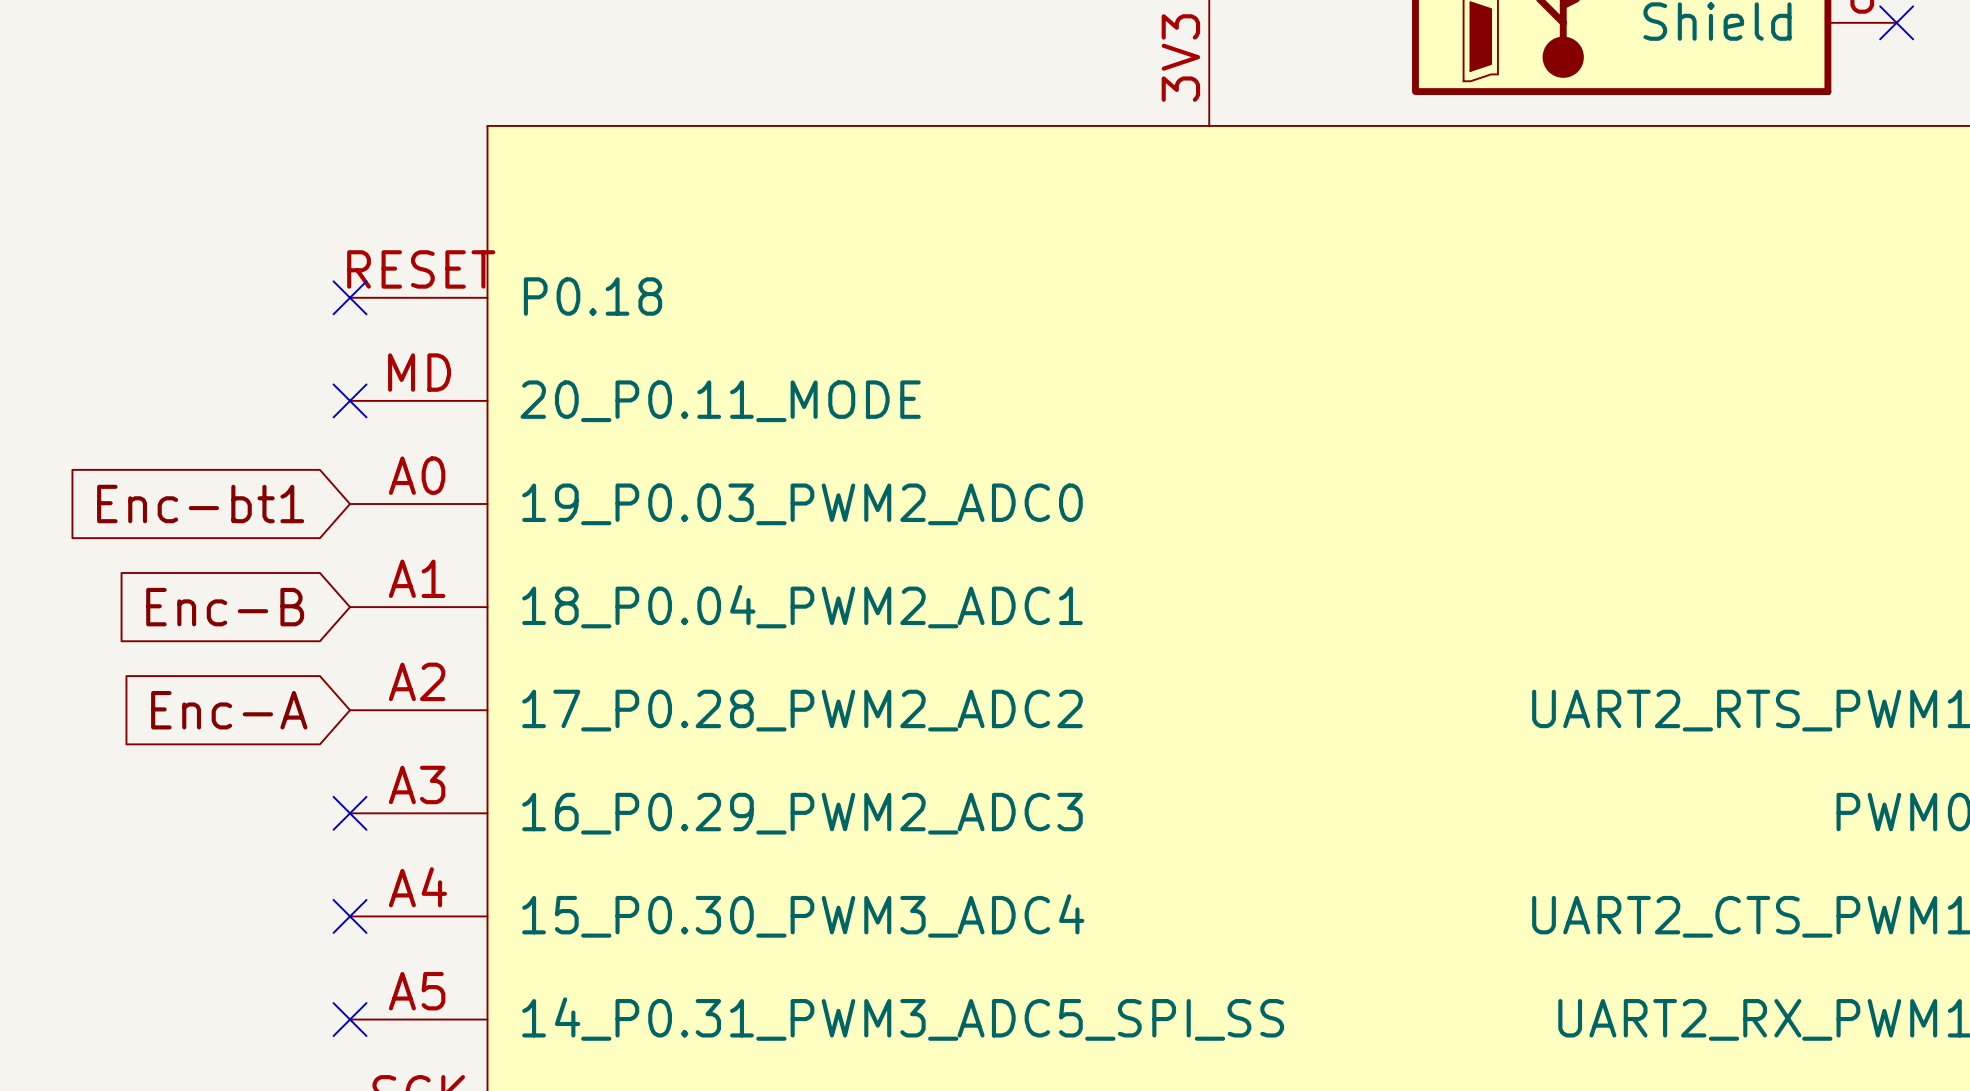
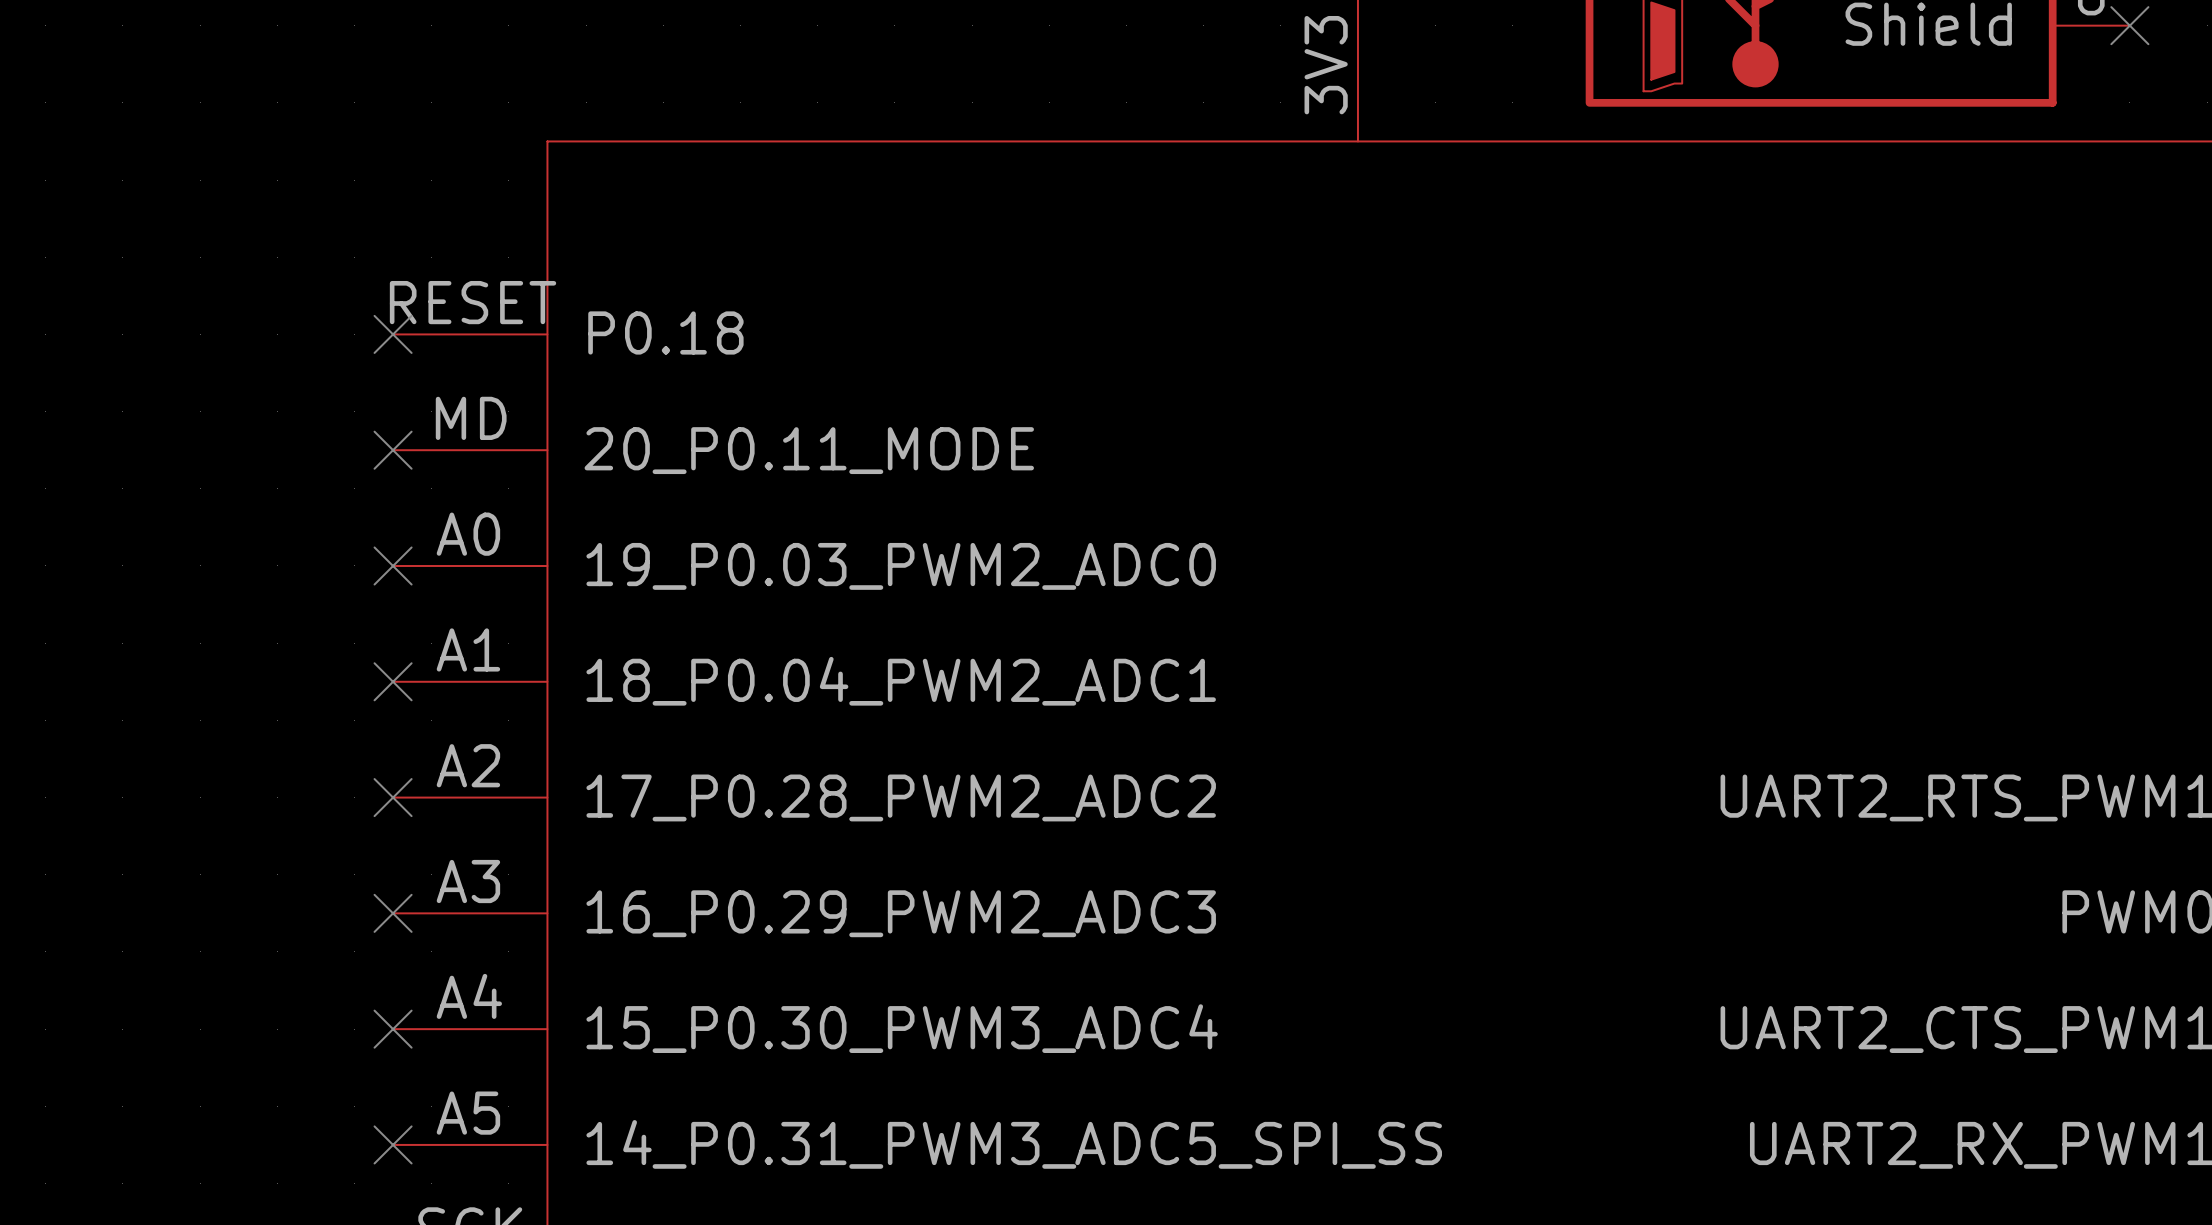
global label: Enc-bt1 (200, 504) -> none
no-connect mark: none -> (393, 565)
global label: Enc-B (225, 607) -> none
no-connect mark: none -> (393, 681)
global label: Enc-A (229, 710) -> none
no-connect mark: none -> (393, 797)

